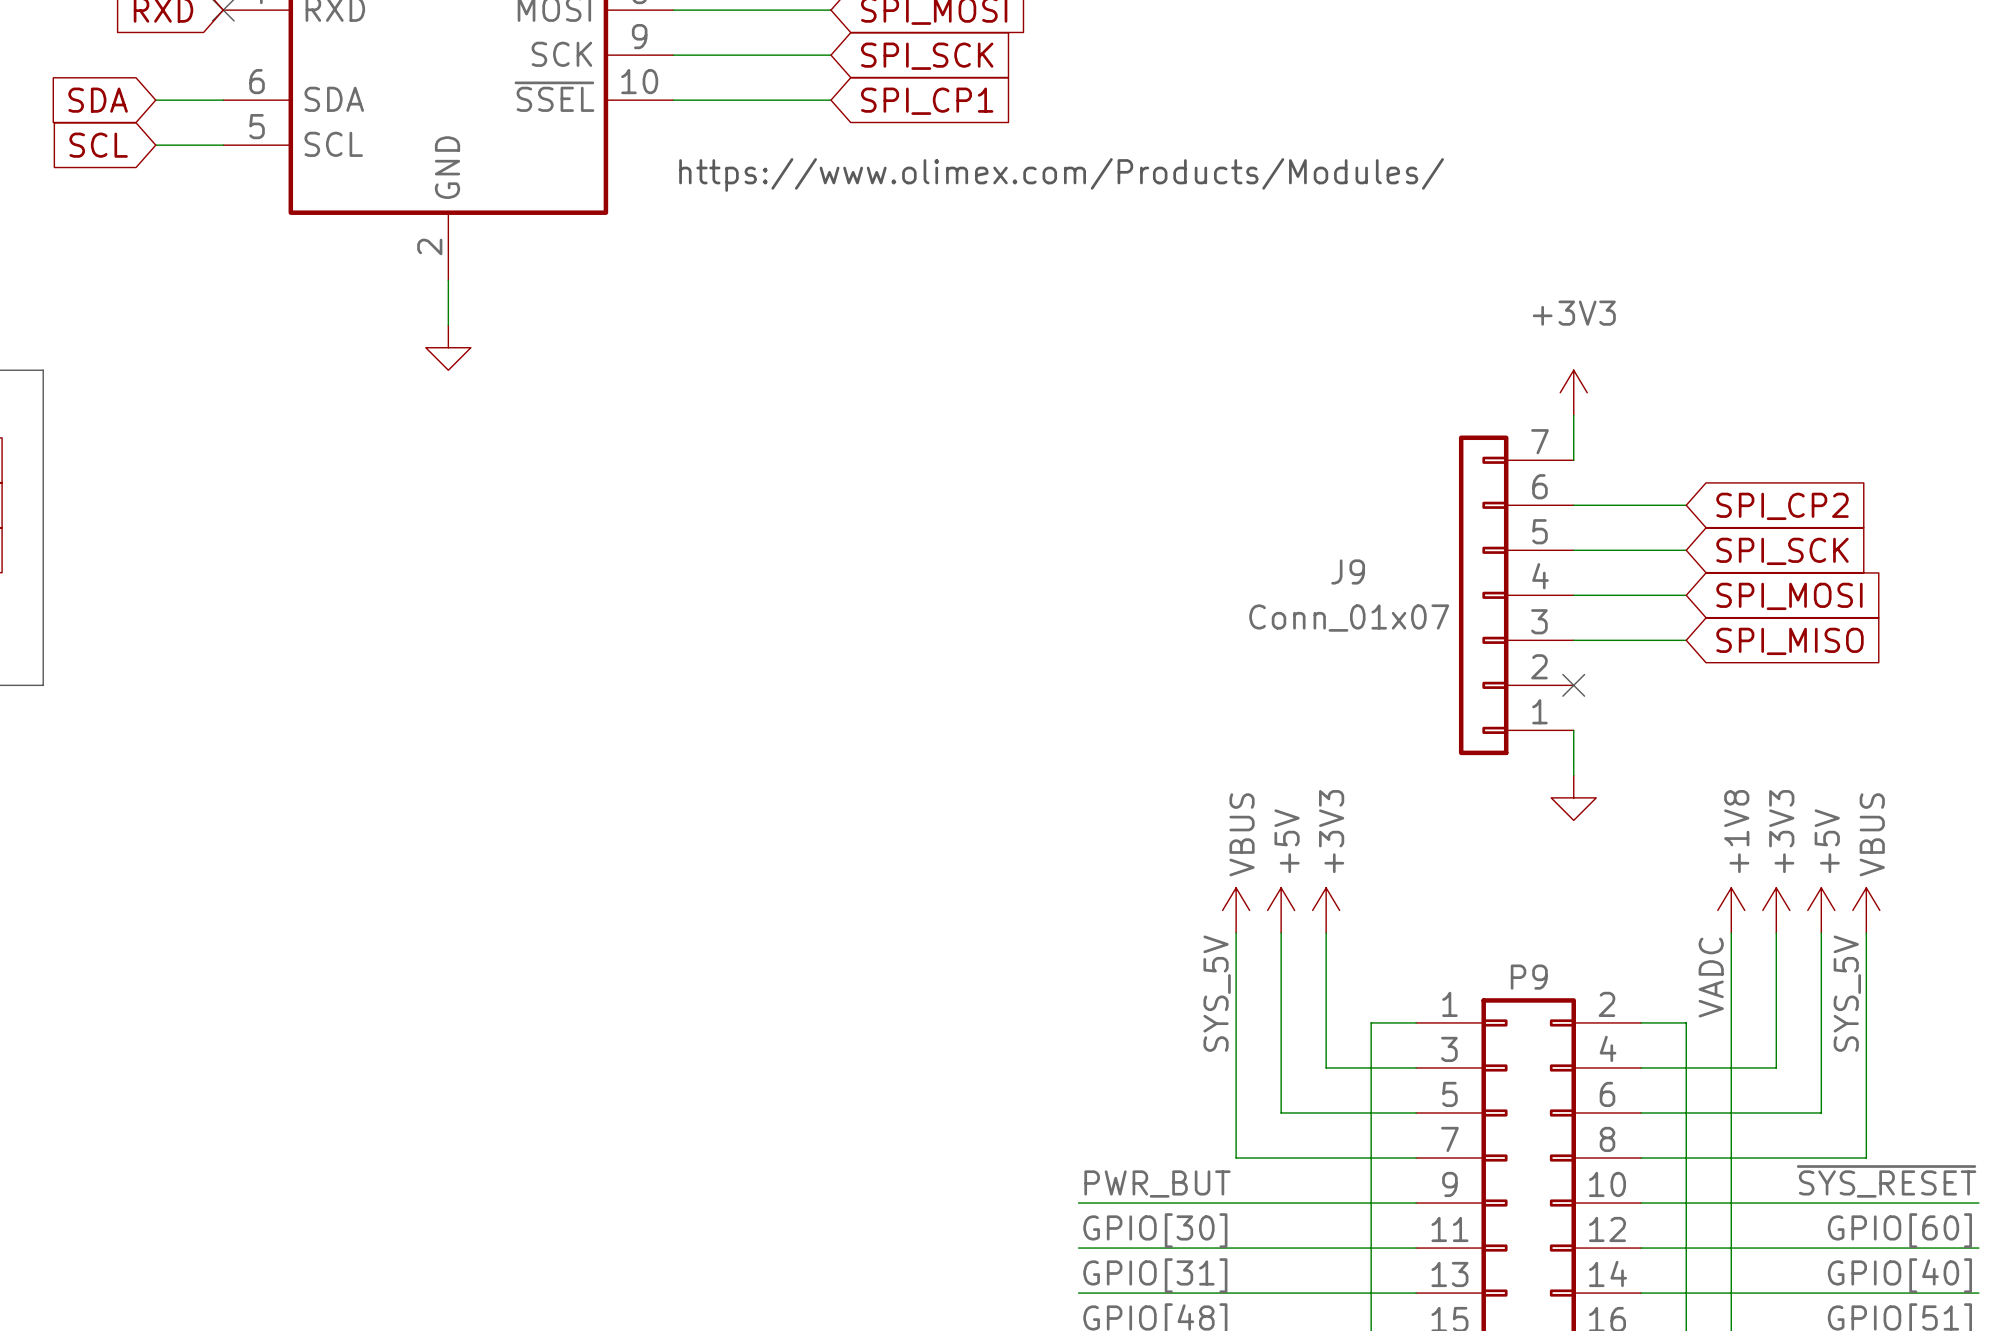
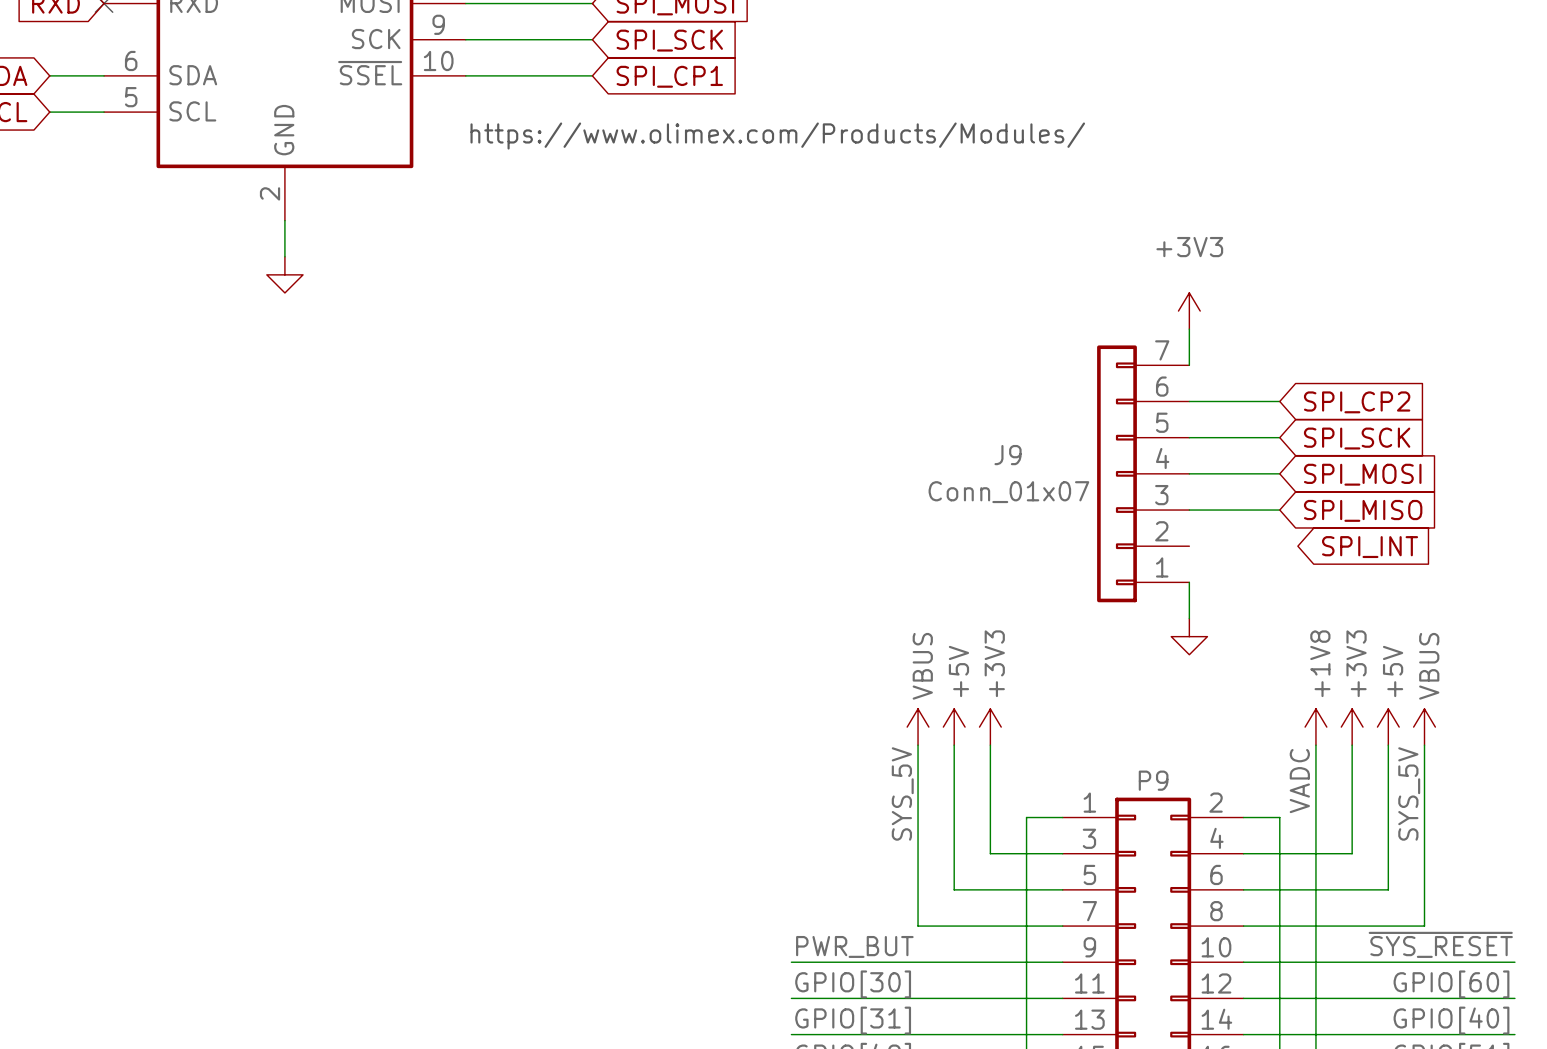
no-connect mark: (1573, 685) -> none
global label: none -> SPI_INT (1370, 547)

